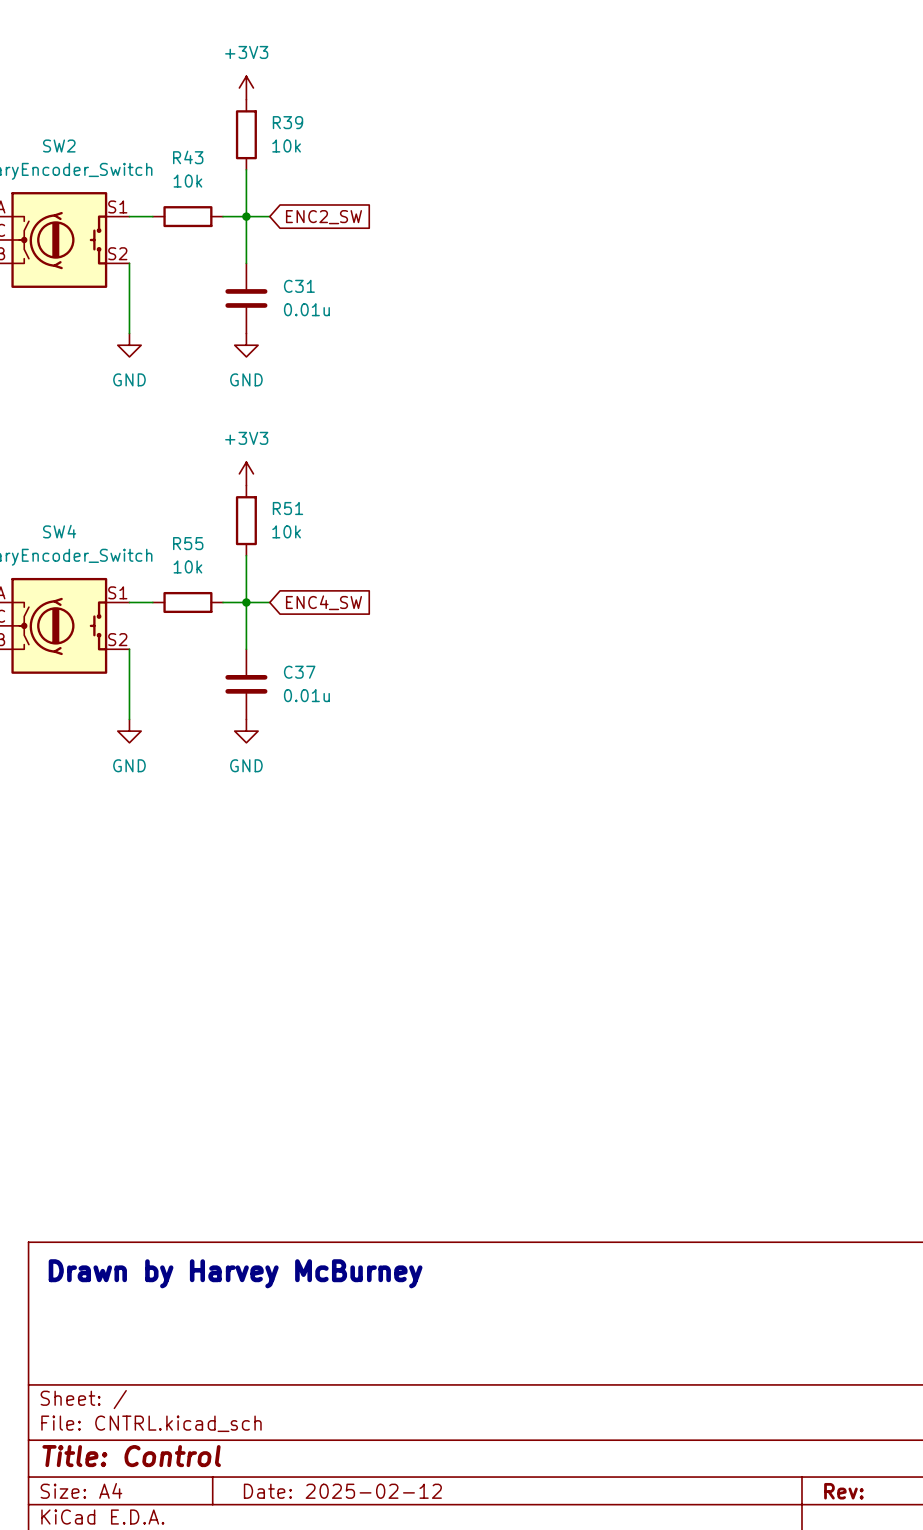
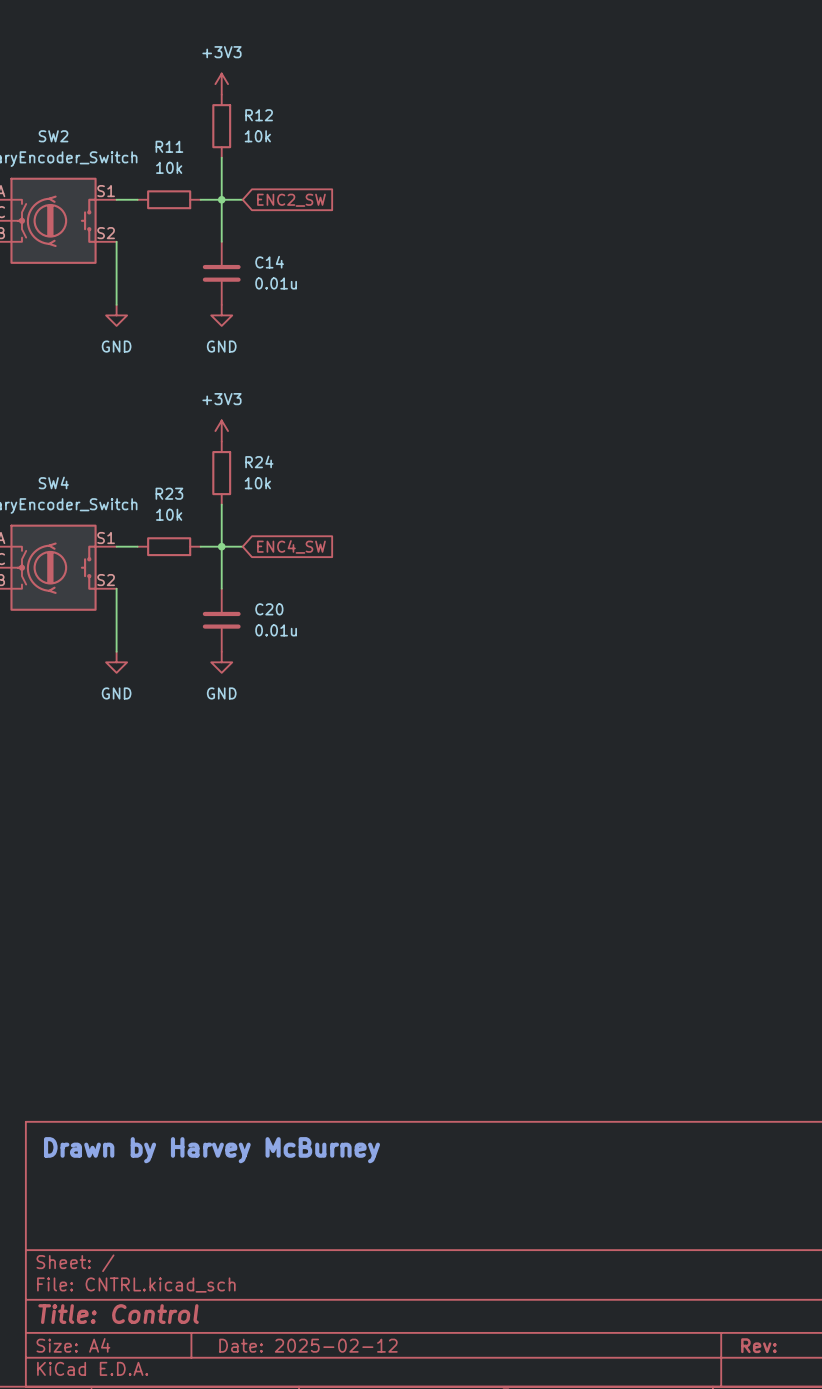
R39 name: R39 (287, 122) -> R12 (259, 115)
R43 name: R43 (188, 157) -> R11 (169, 146)
C31 name: C31 (299, 286) -> C14 (269, 262)
R51 name: R51 (287, 508) -> R24 (259, 461)
R55 name: R55 (188, 543) -> R23 (169, 493)
C37 name: C37 (299, 672) -> C20 (269, 609)

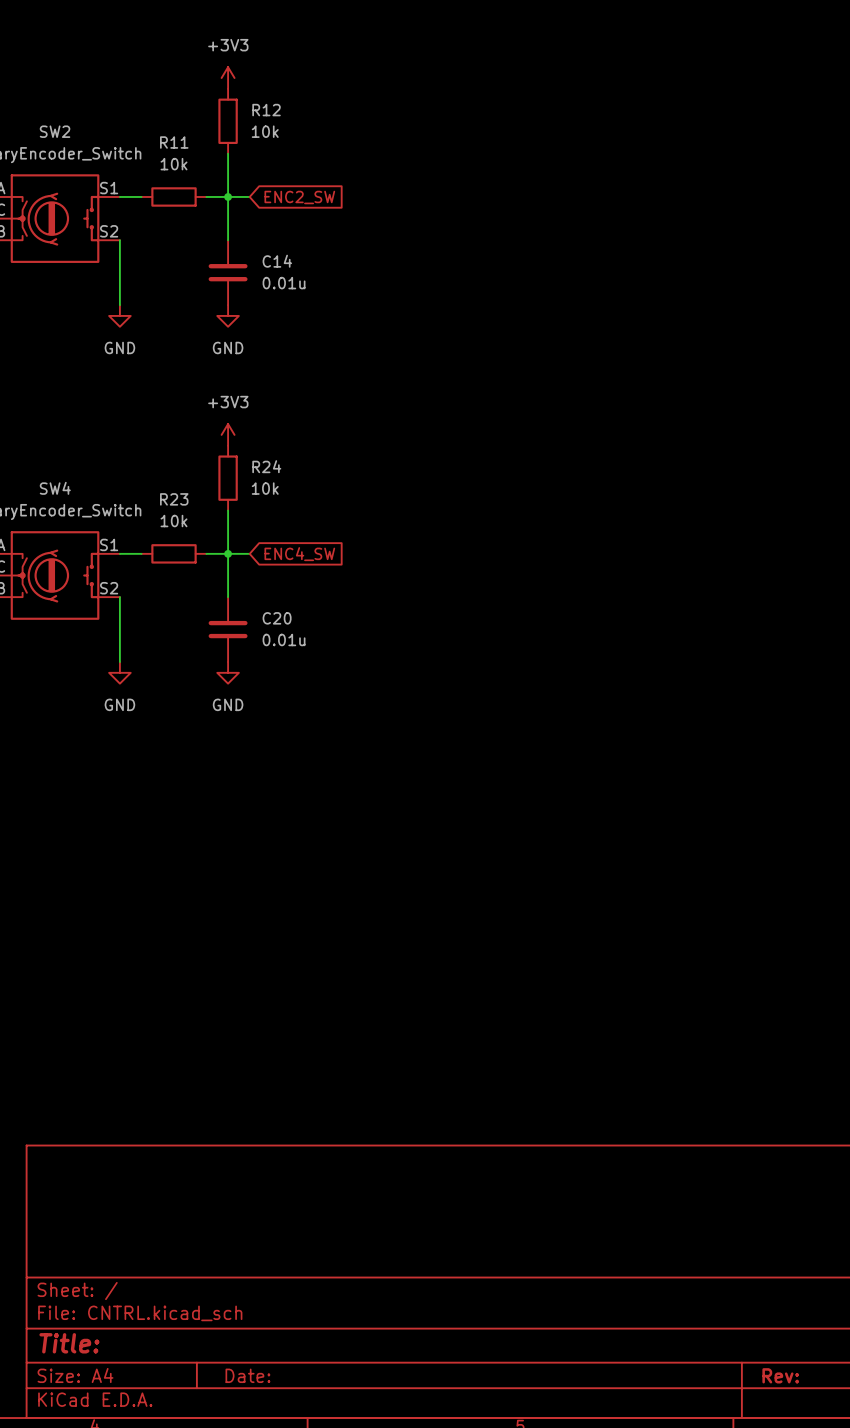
text: Drawn by Harvey McBurney (212, 1150) -> none
title block: Title: Control (118, 1314) -> Title: (69, 1343)
title block: Date: 2025-02-12 (308, 1345) -> Date: (247, 1375)

